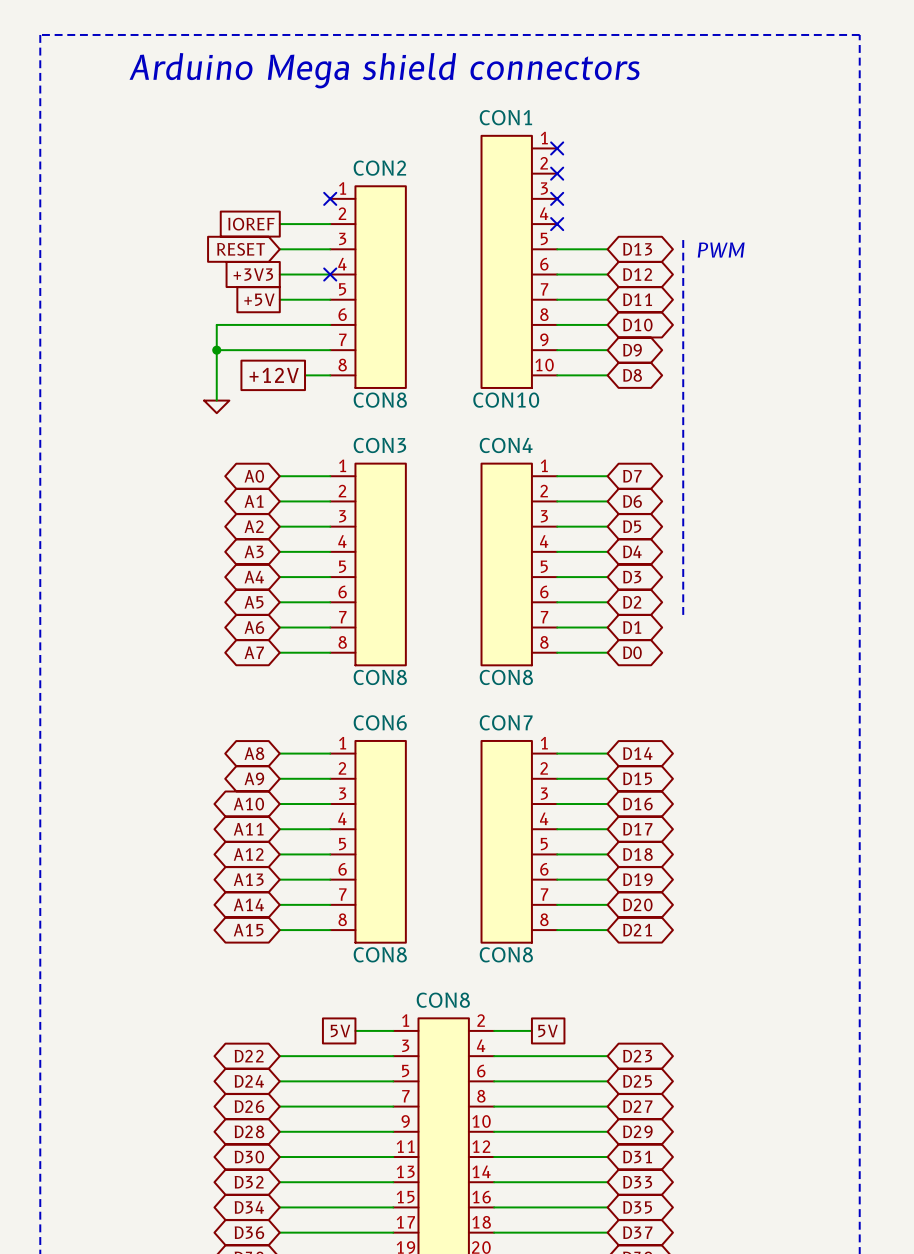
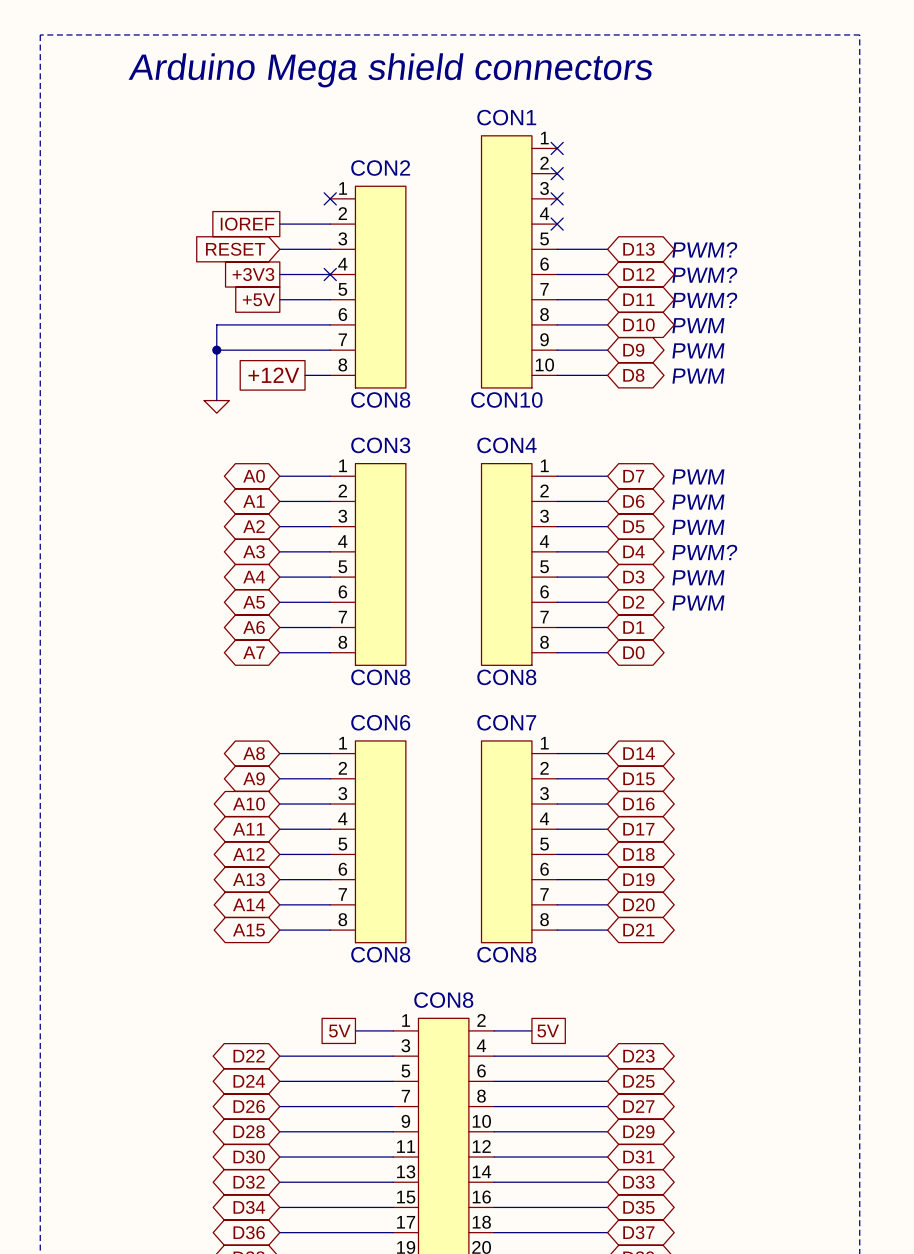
line: (683, 236) (683, 614) -> none
text: none -> PWM? (704, 249)
text: PWM (721, 250) -> none
text: none -> PWM? (704, 275)
text: none -> PWM? (704, 300)
text: none -> PWM (698, 325)
text: none -> PWM (698, 350)
text: none -> PWM (698, 376)
text: none -> PWM (698, 476)
text: none -> PWM (698, 502)
text: none -> PWM (698, 527)
text: none -> PWM? (704, 552)
text: none -> PWM (698, 577)
text: none -> PWM (698, 603)

